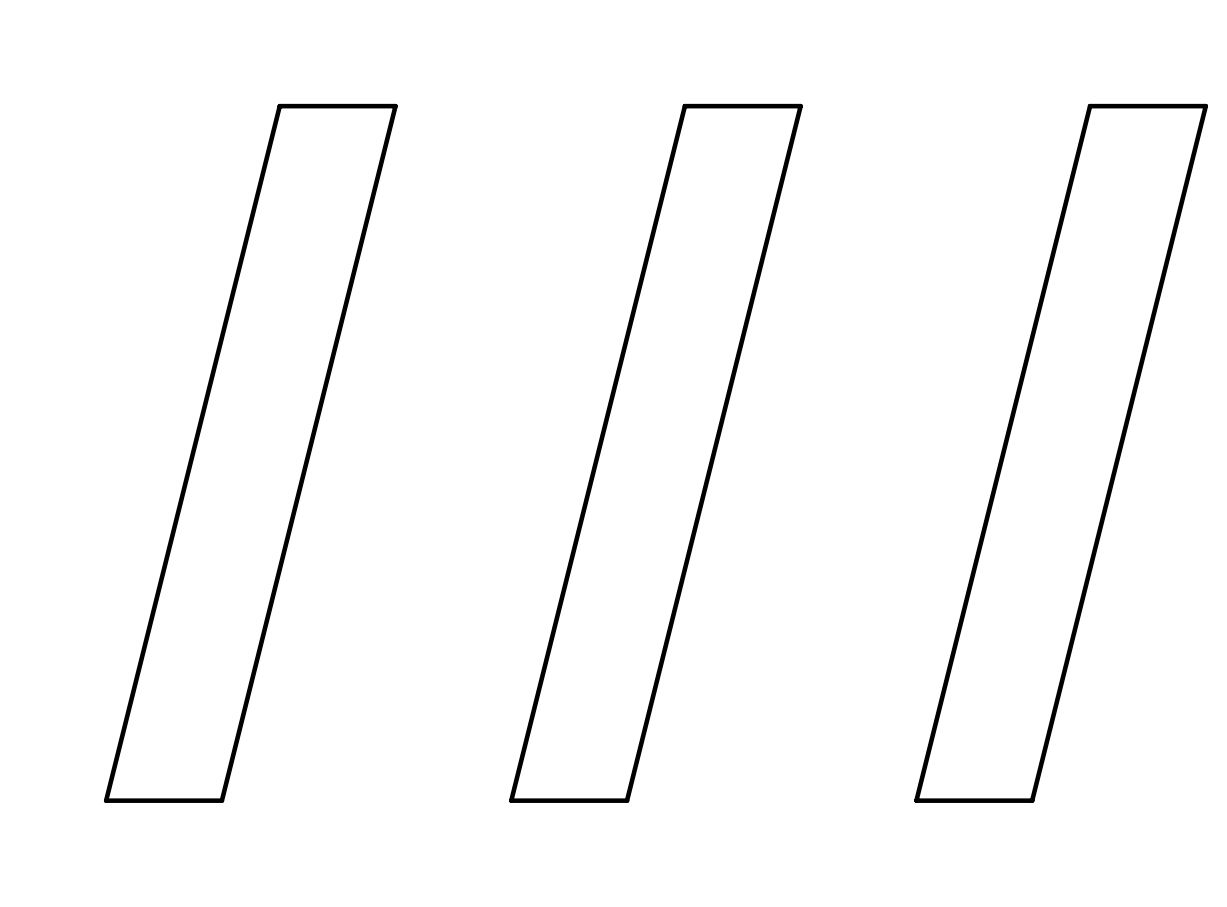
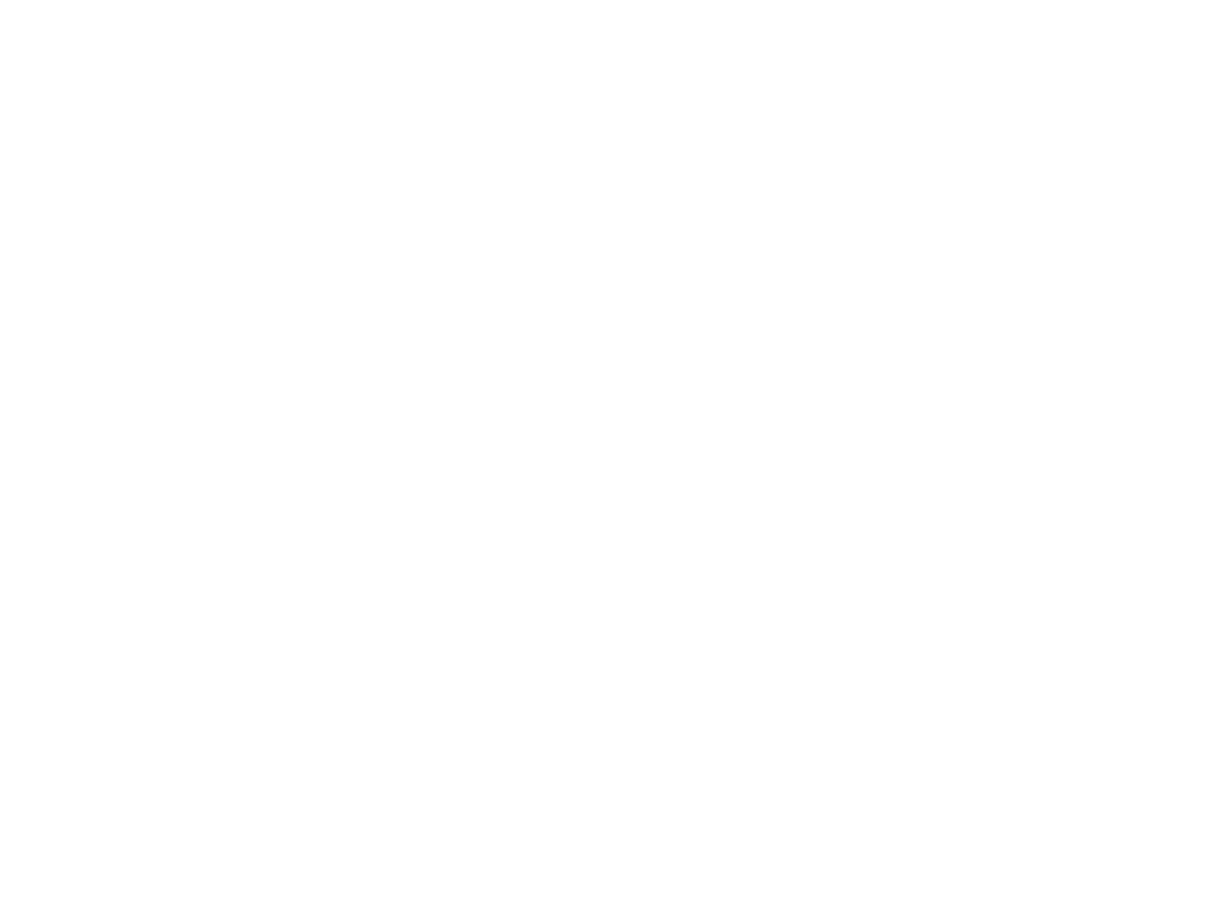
line: (395, 106) (279, 106) (106, 800) (221, 800) (395, 106) -> none
line: (800, 106) (684, 106) (511, 800) (627, 800) (800, 106) -> none
line: (1205, 106) (1090, 106) (916, 800) (1032, 800) (1205, 106) -> none

